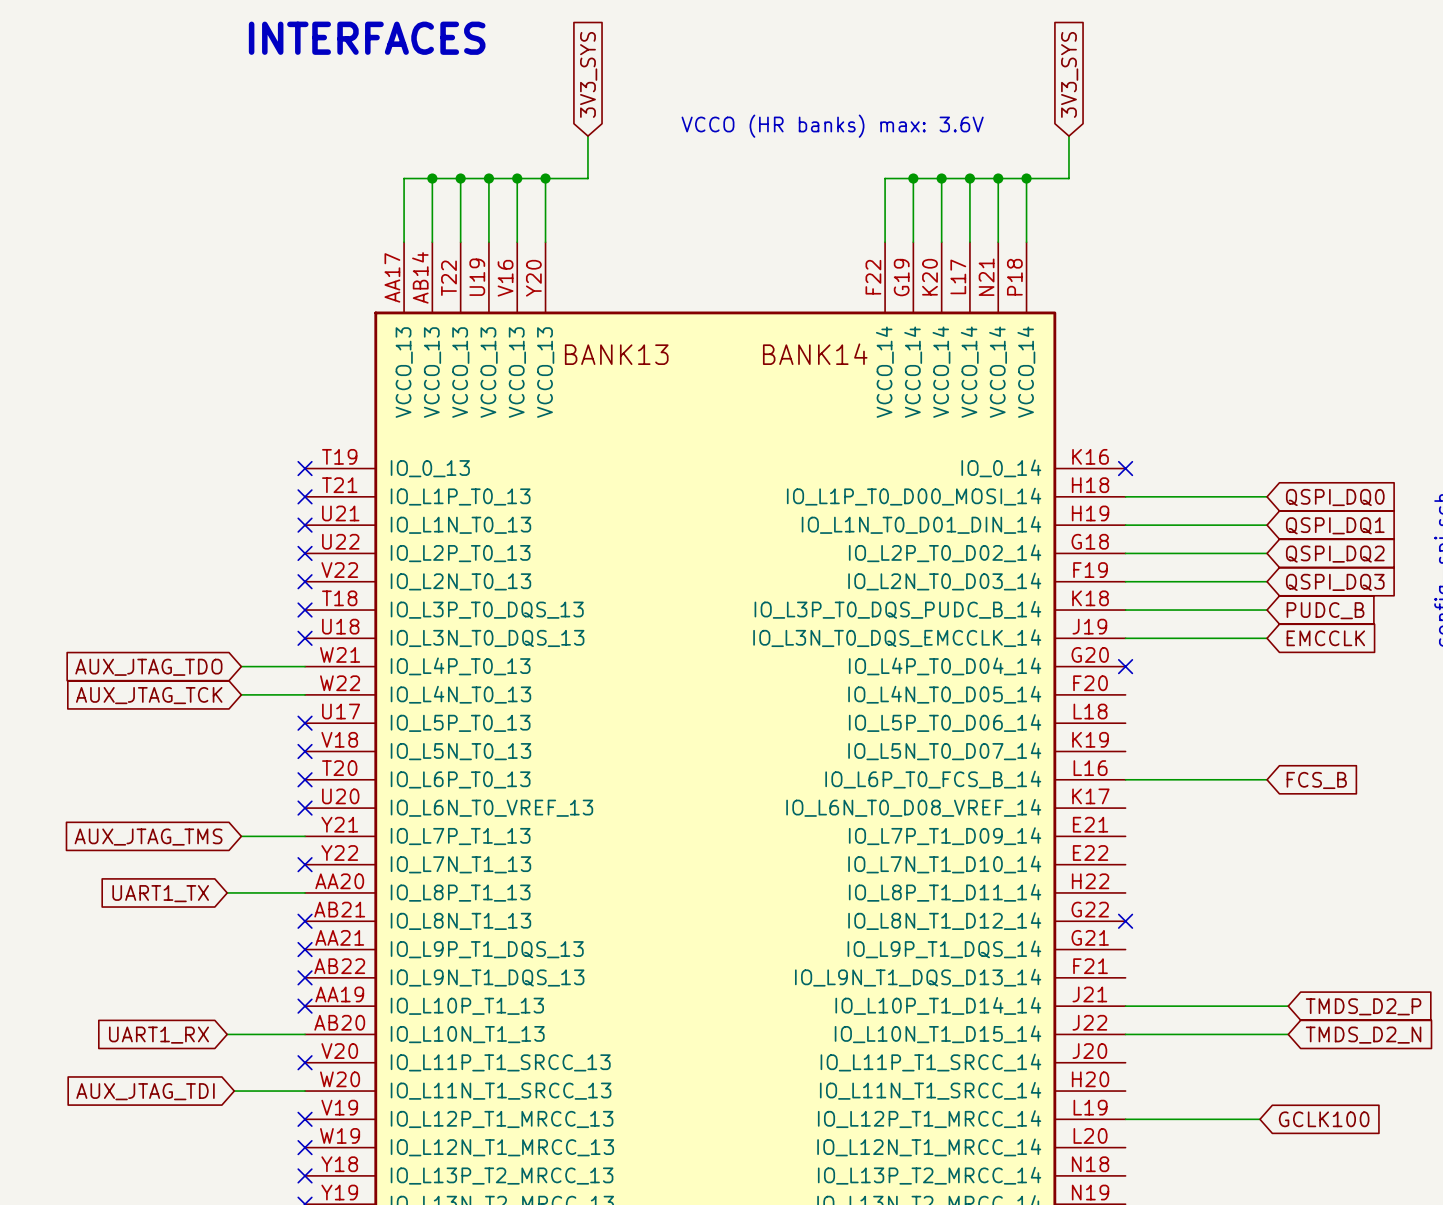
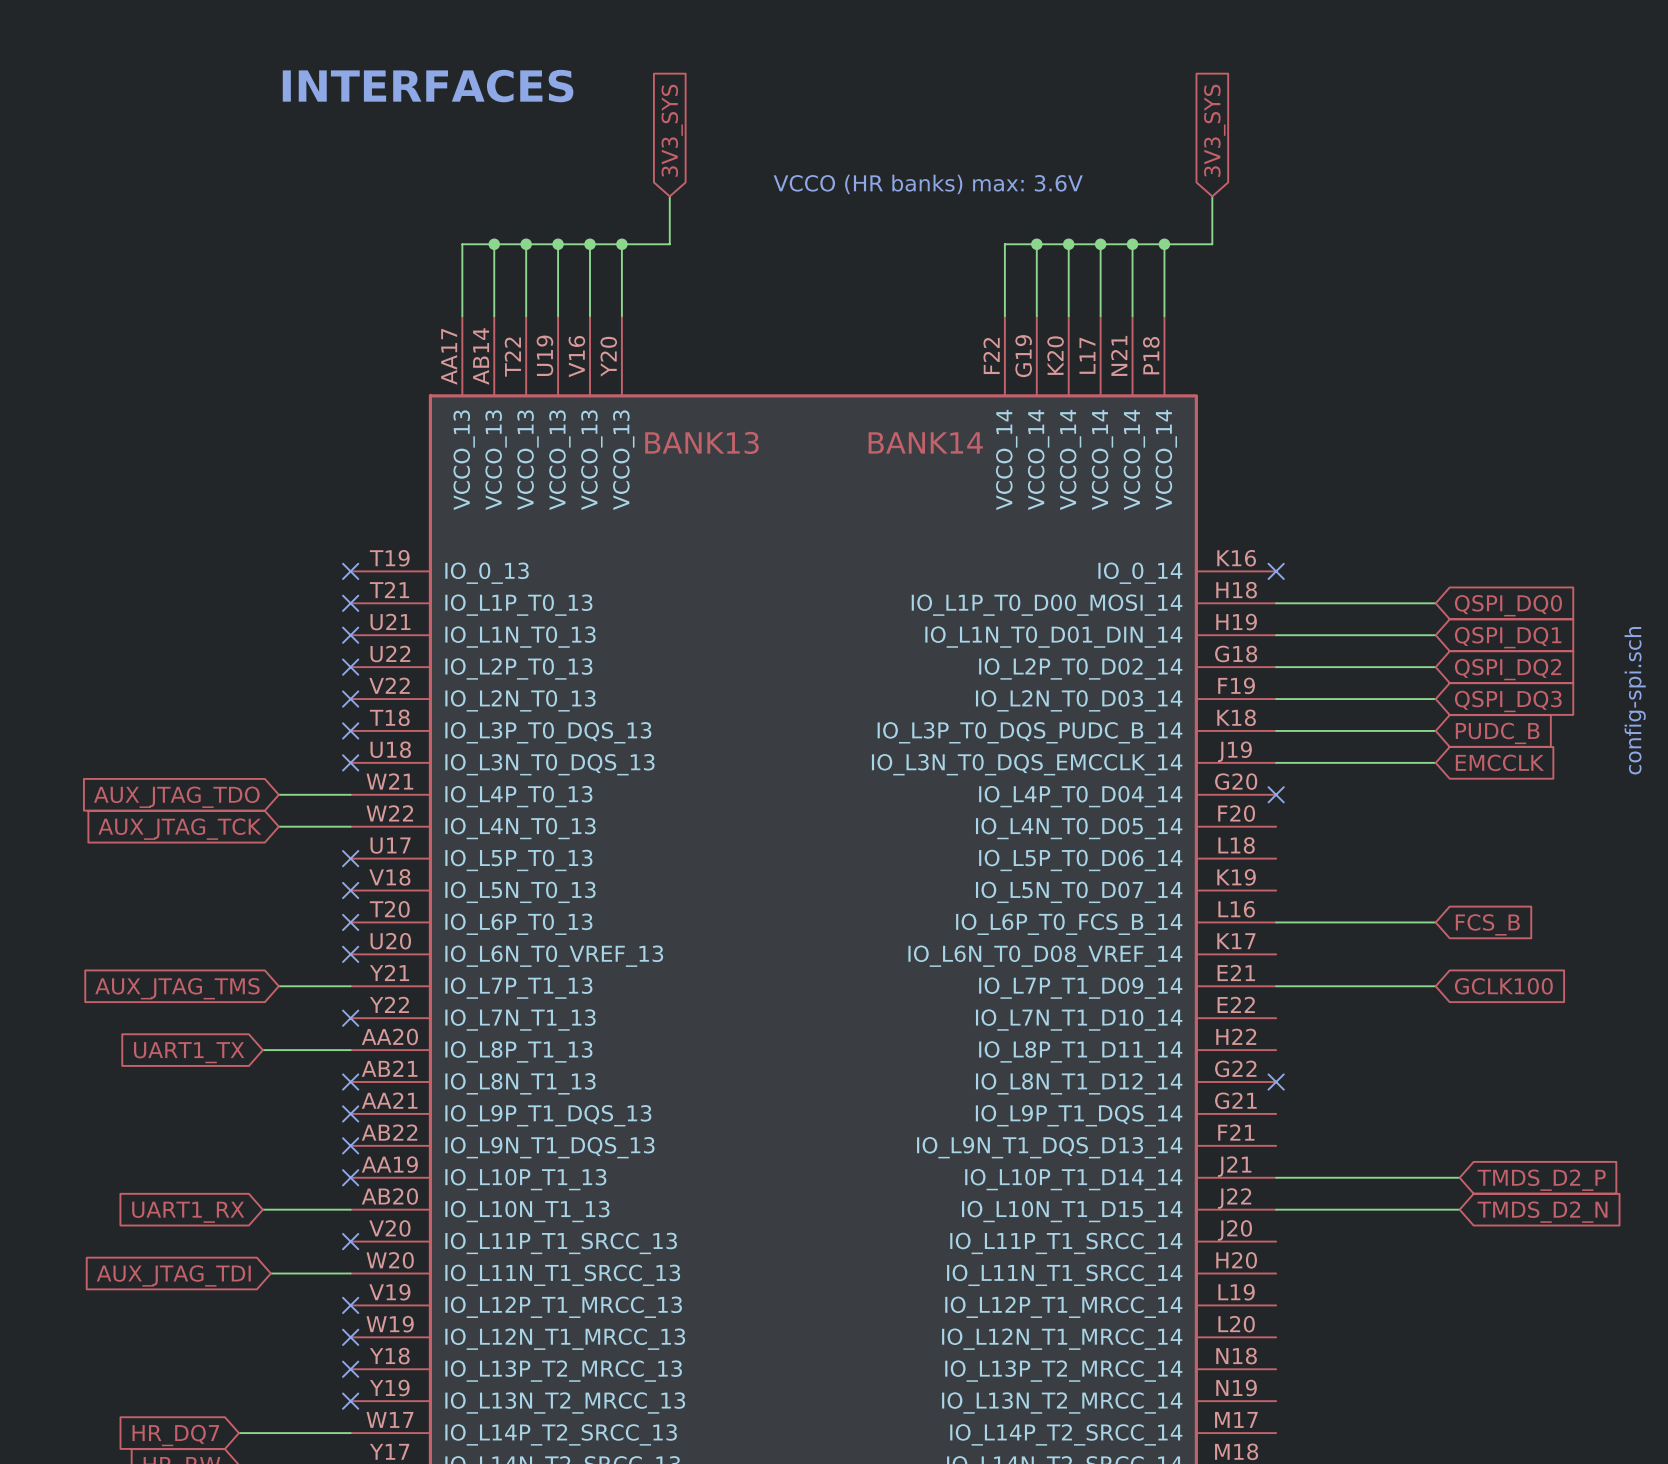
wire: none -> (1276, 986) (1435, 986)
global label: none -> GCLK100 (1503, 986)
wire: (1125, 1119) (1259, 1119) -> none
global label: GCLK100 (1324, 1119) -> none

